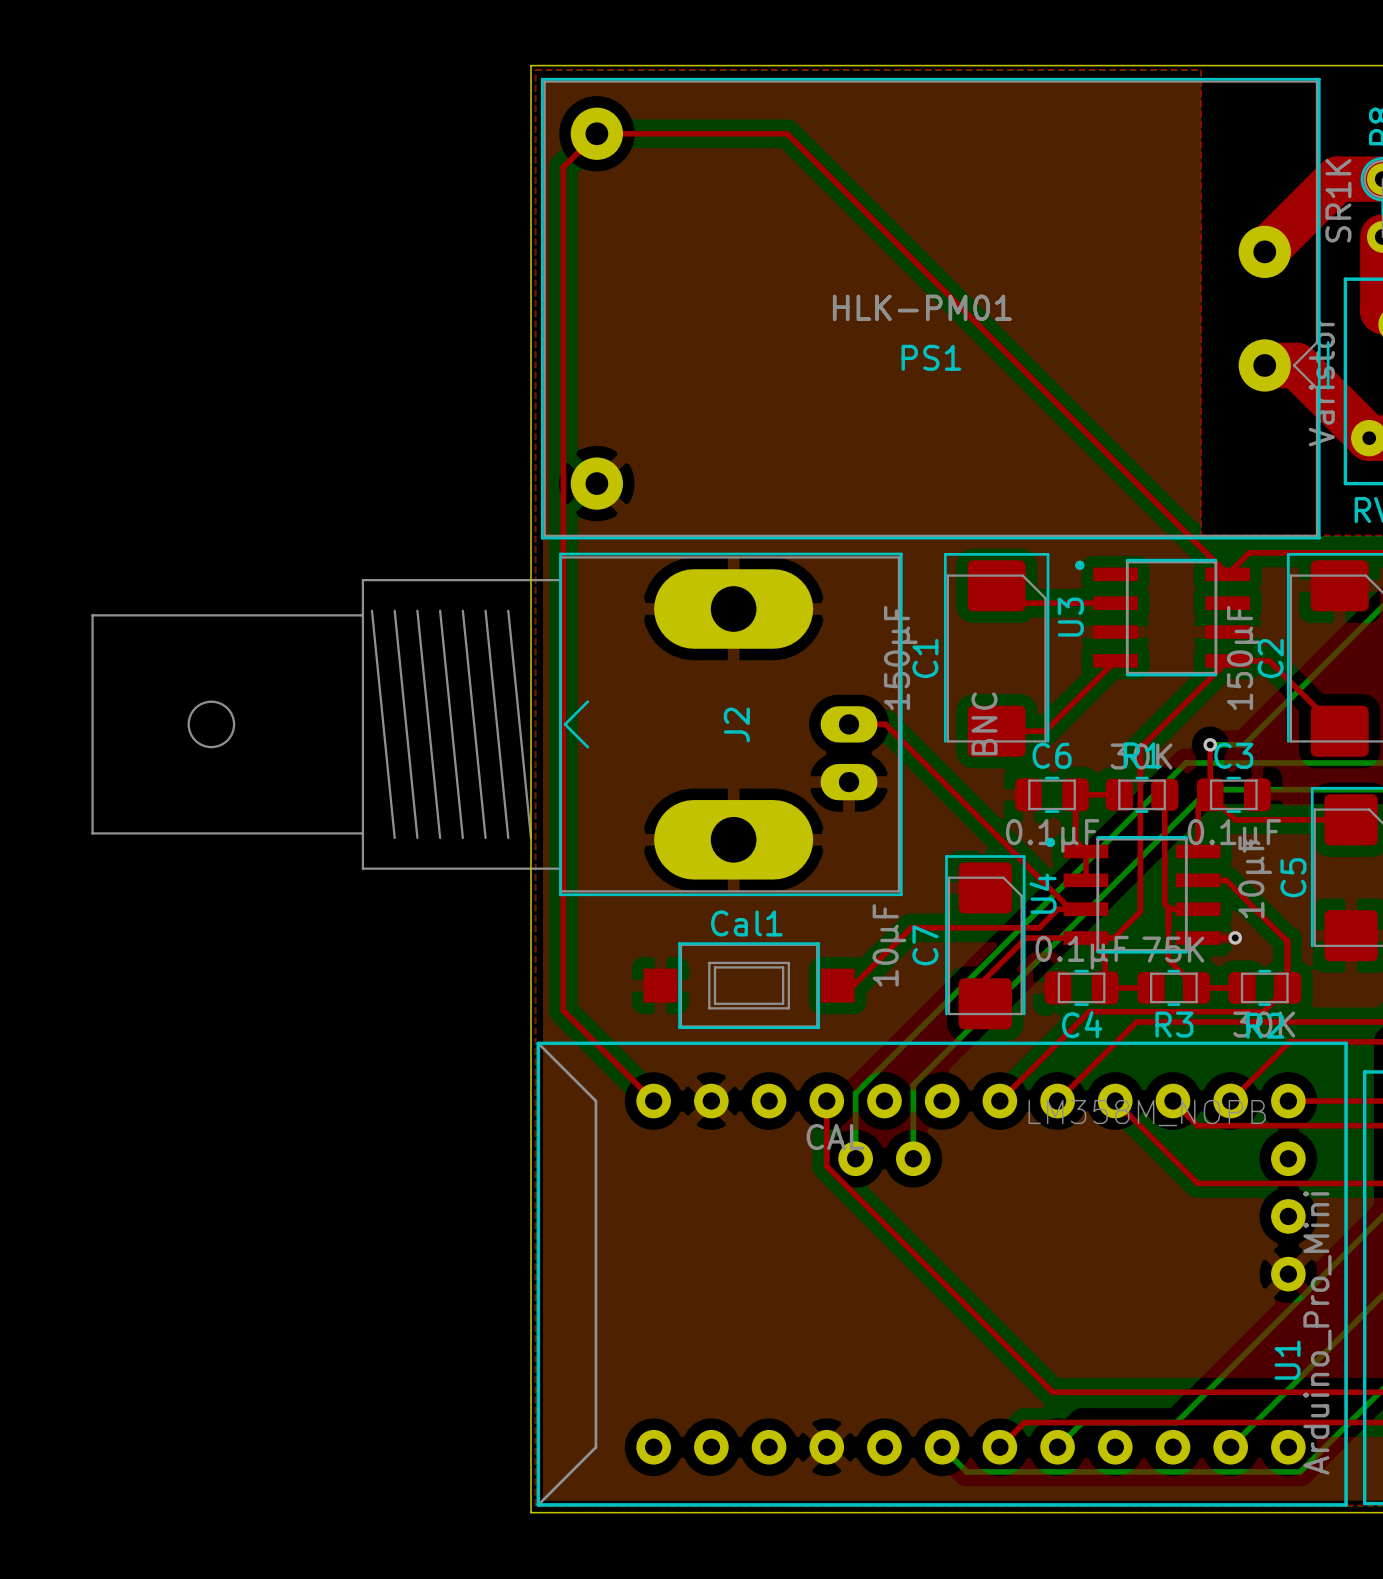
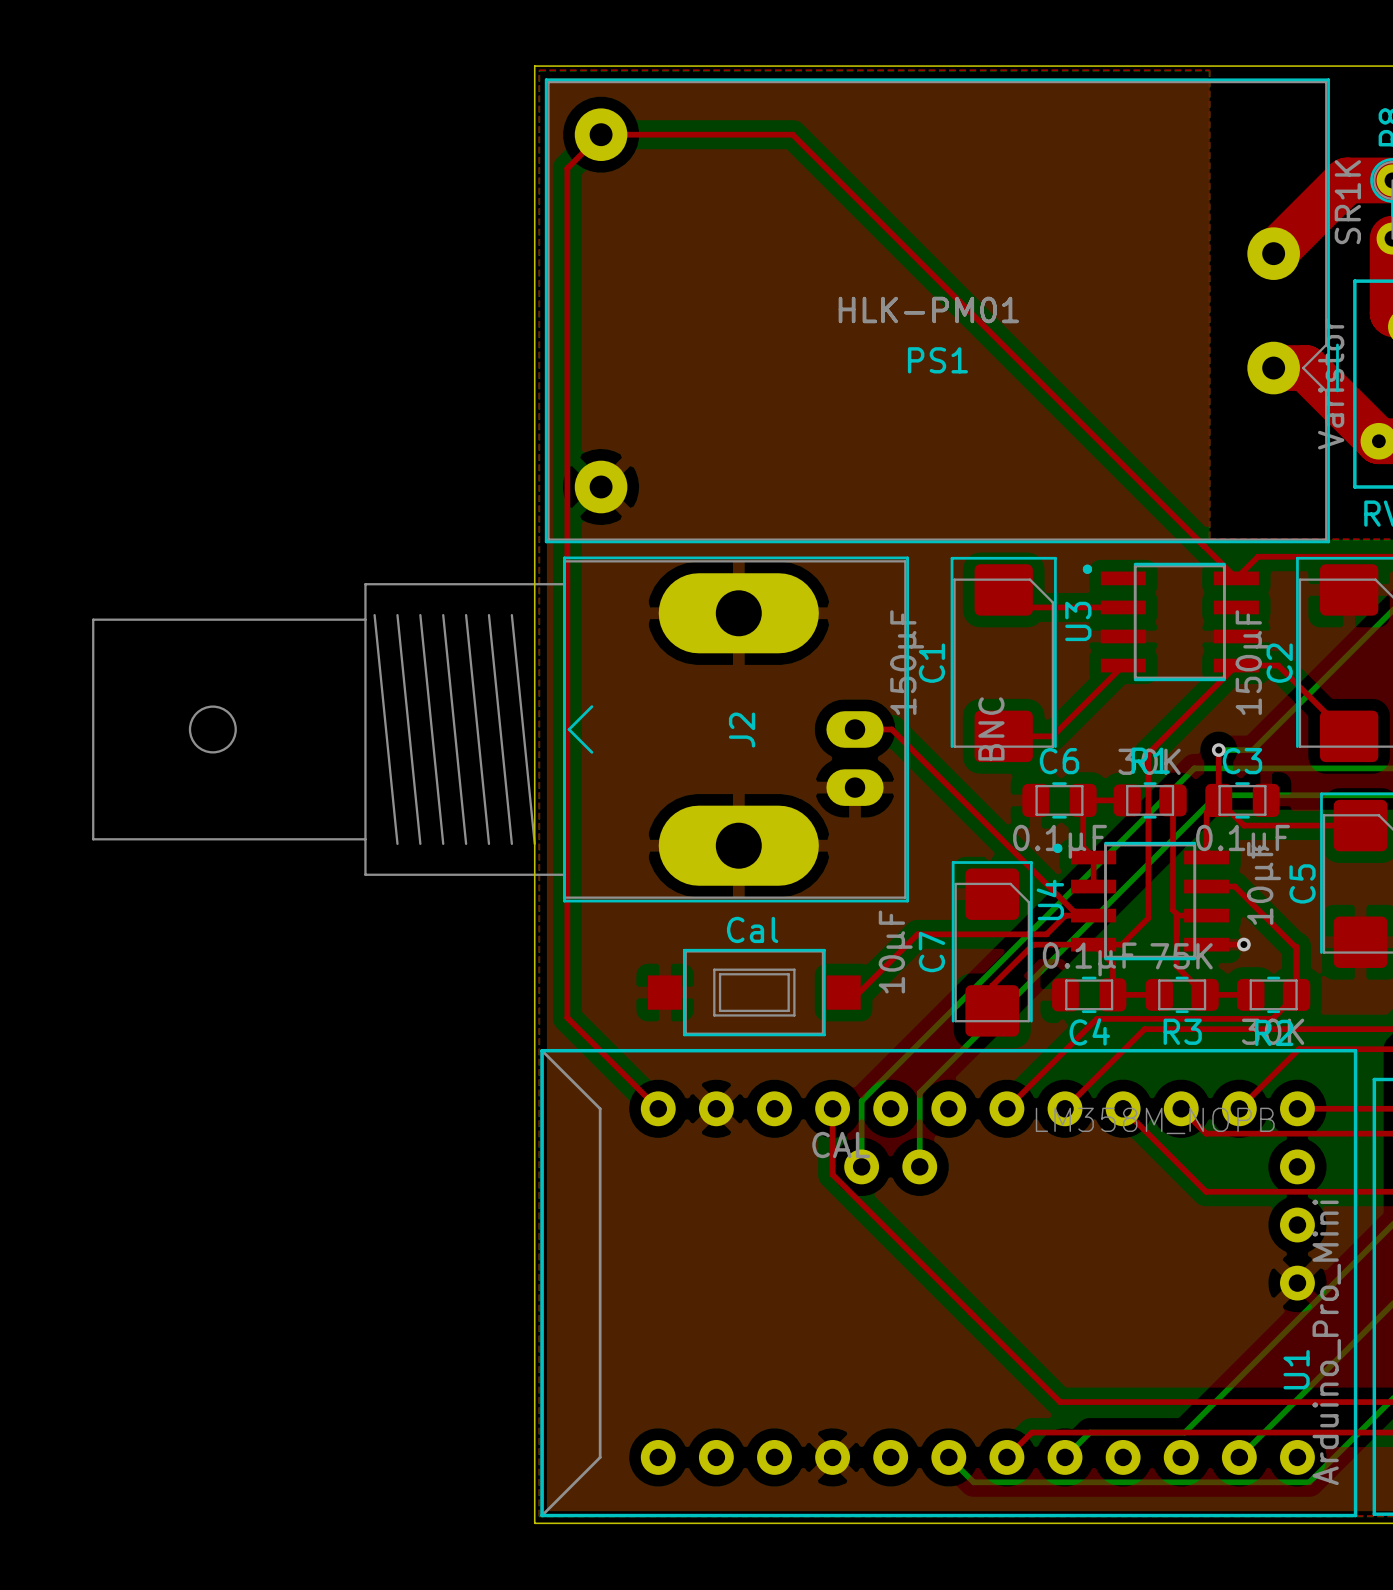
Cal1 name: Cal1 (746, 923) -> Cal (752, 929)

